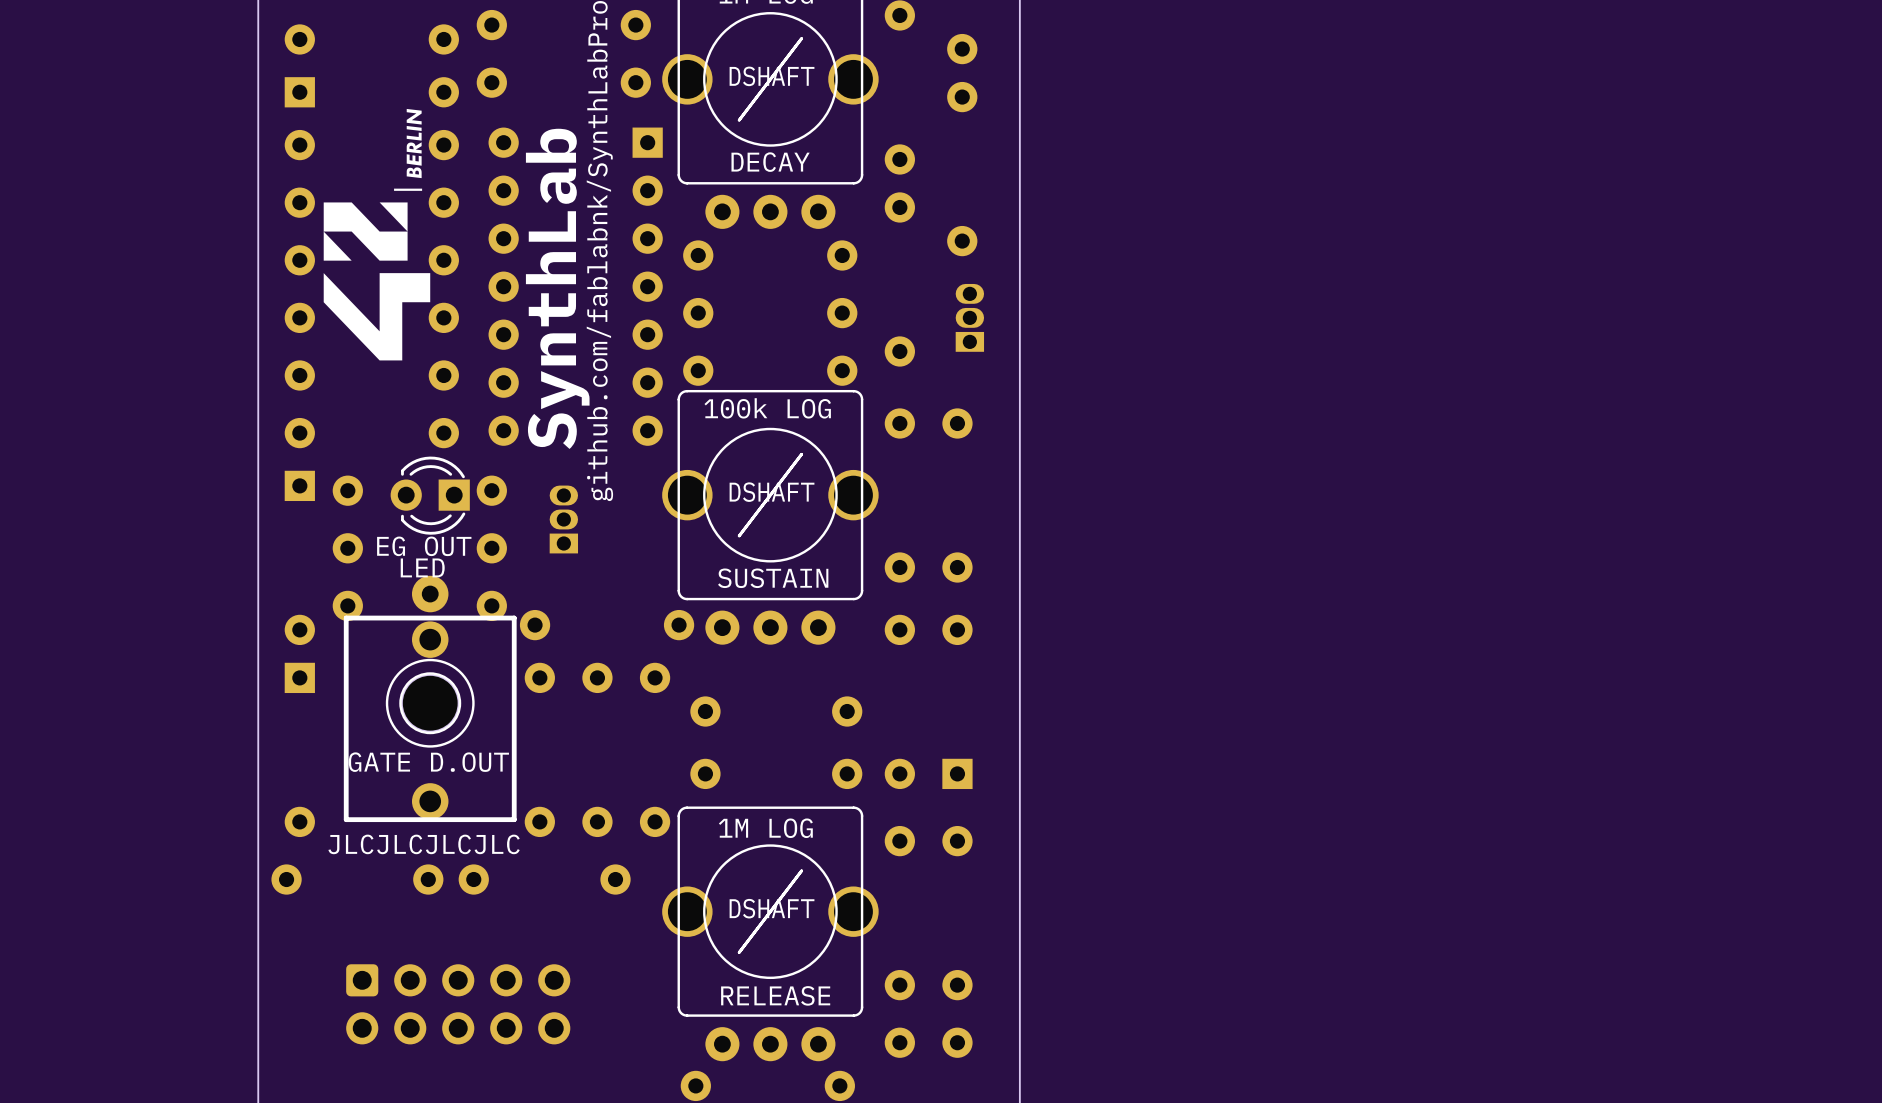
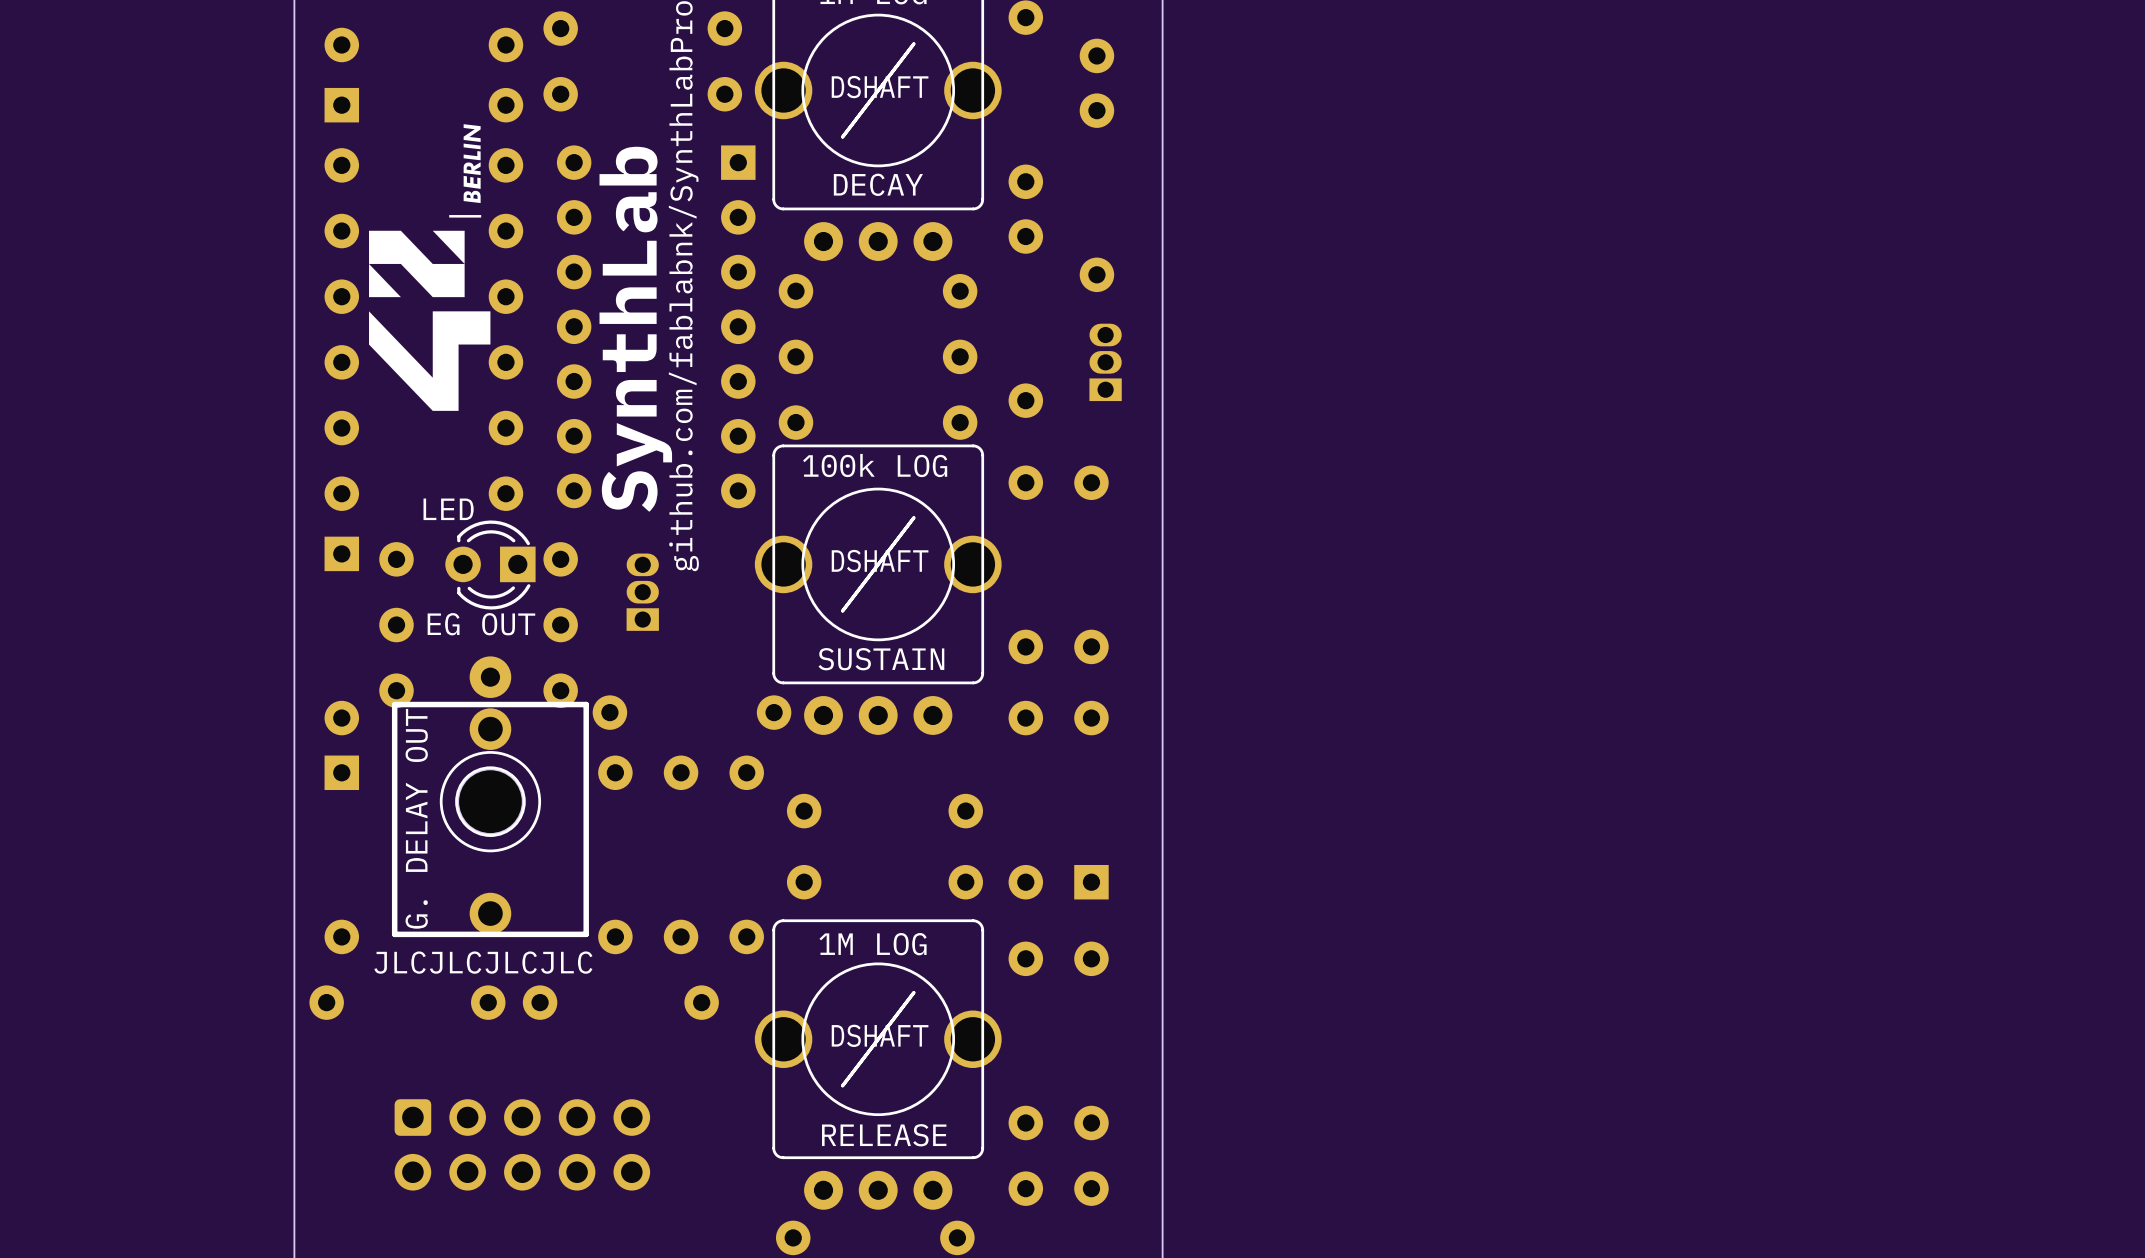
part value: EG OUT (424, 546) -> LED (448, 509)
part text: none -> EG OUT (481, 624)
text: LED (422, 567) -> none
part text: none -> G. DELAY OUT (416, 818)
part value: GATE D.OUT (428, 762) -> none

